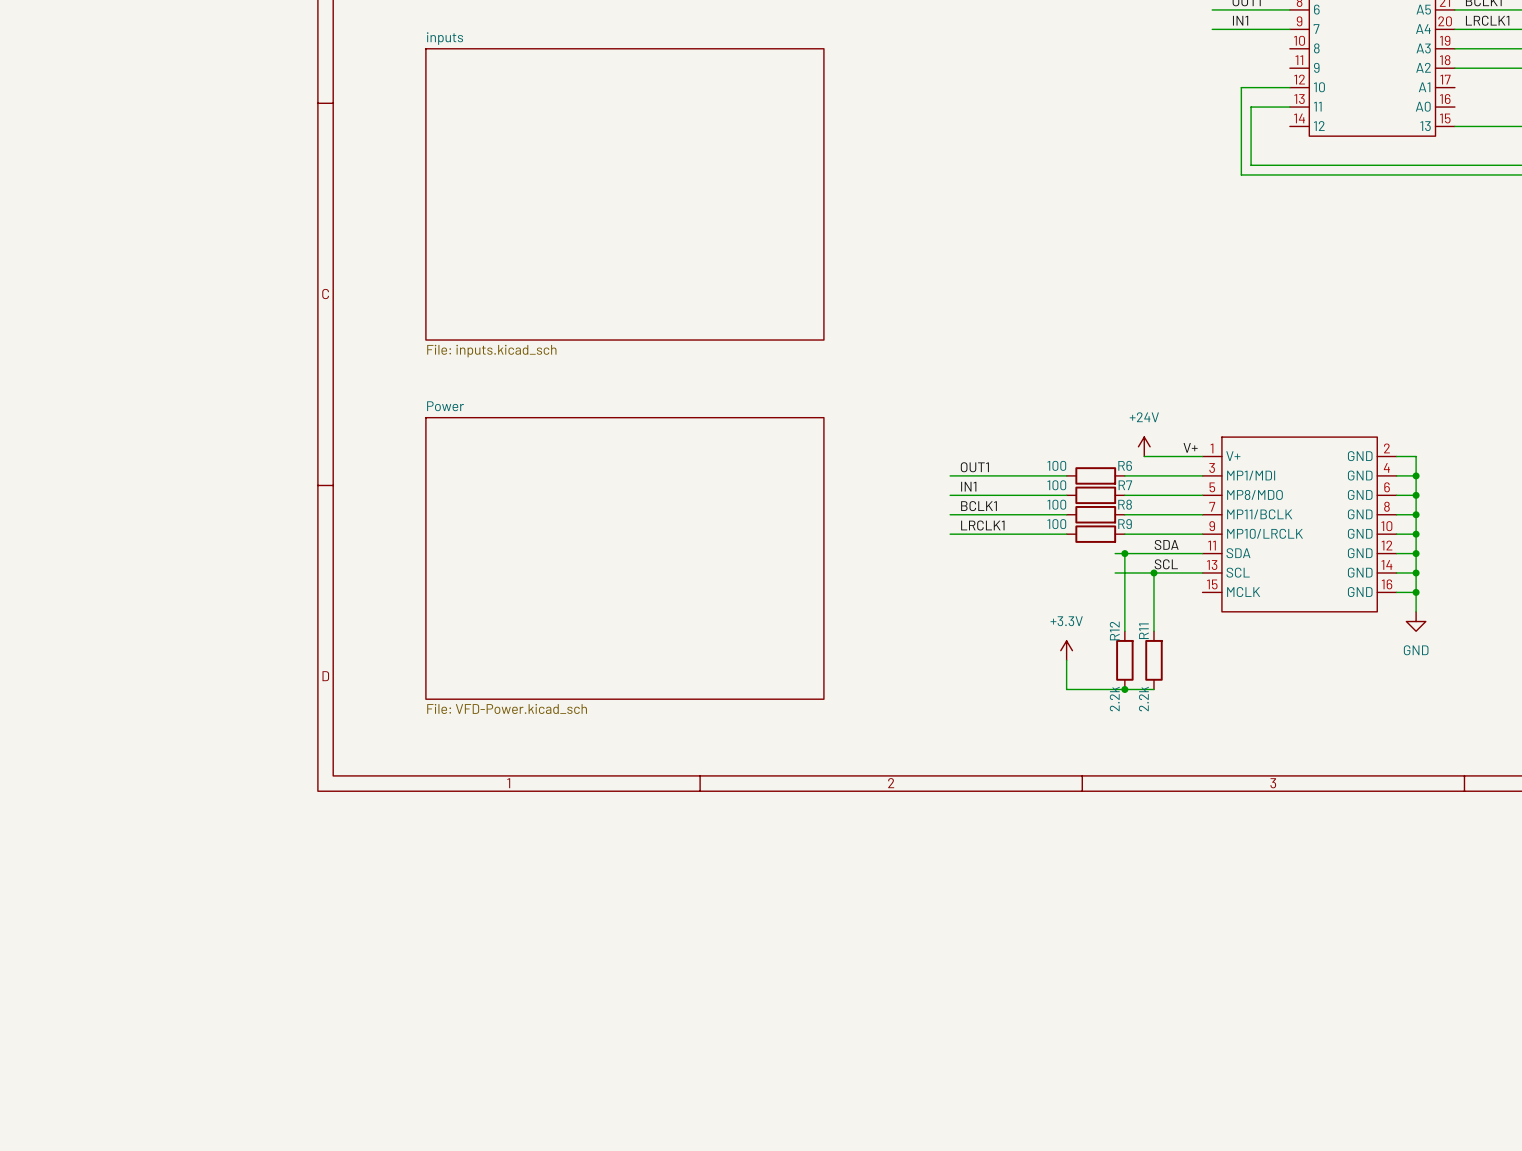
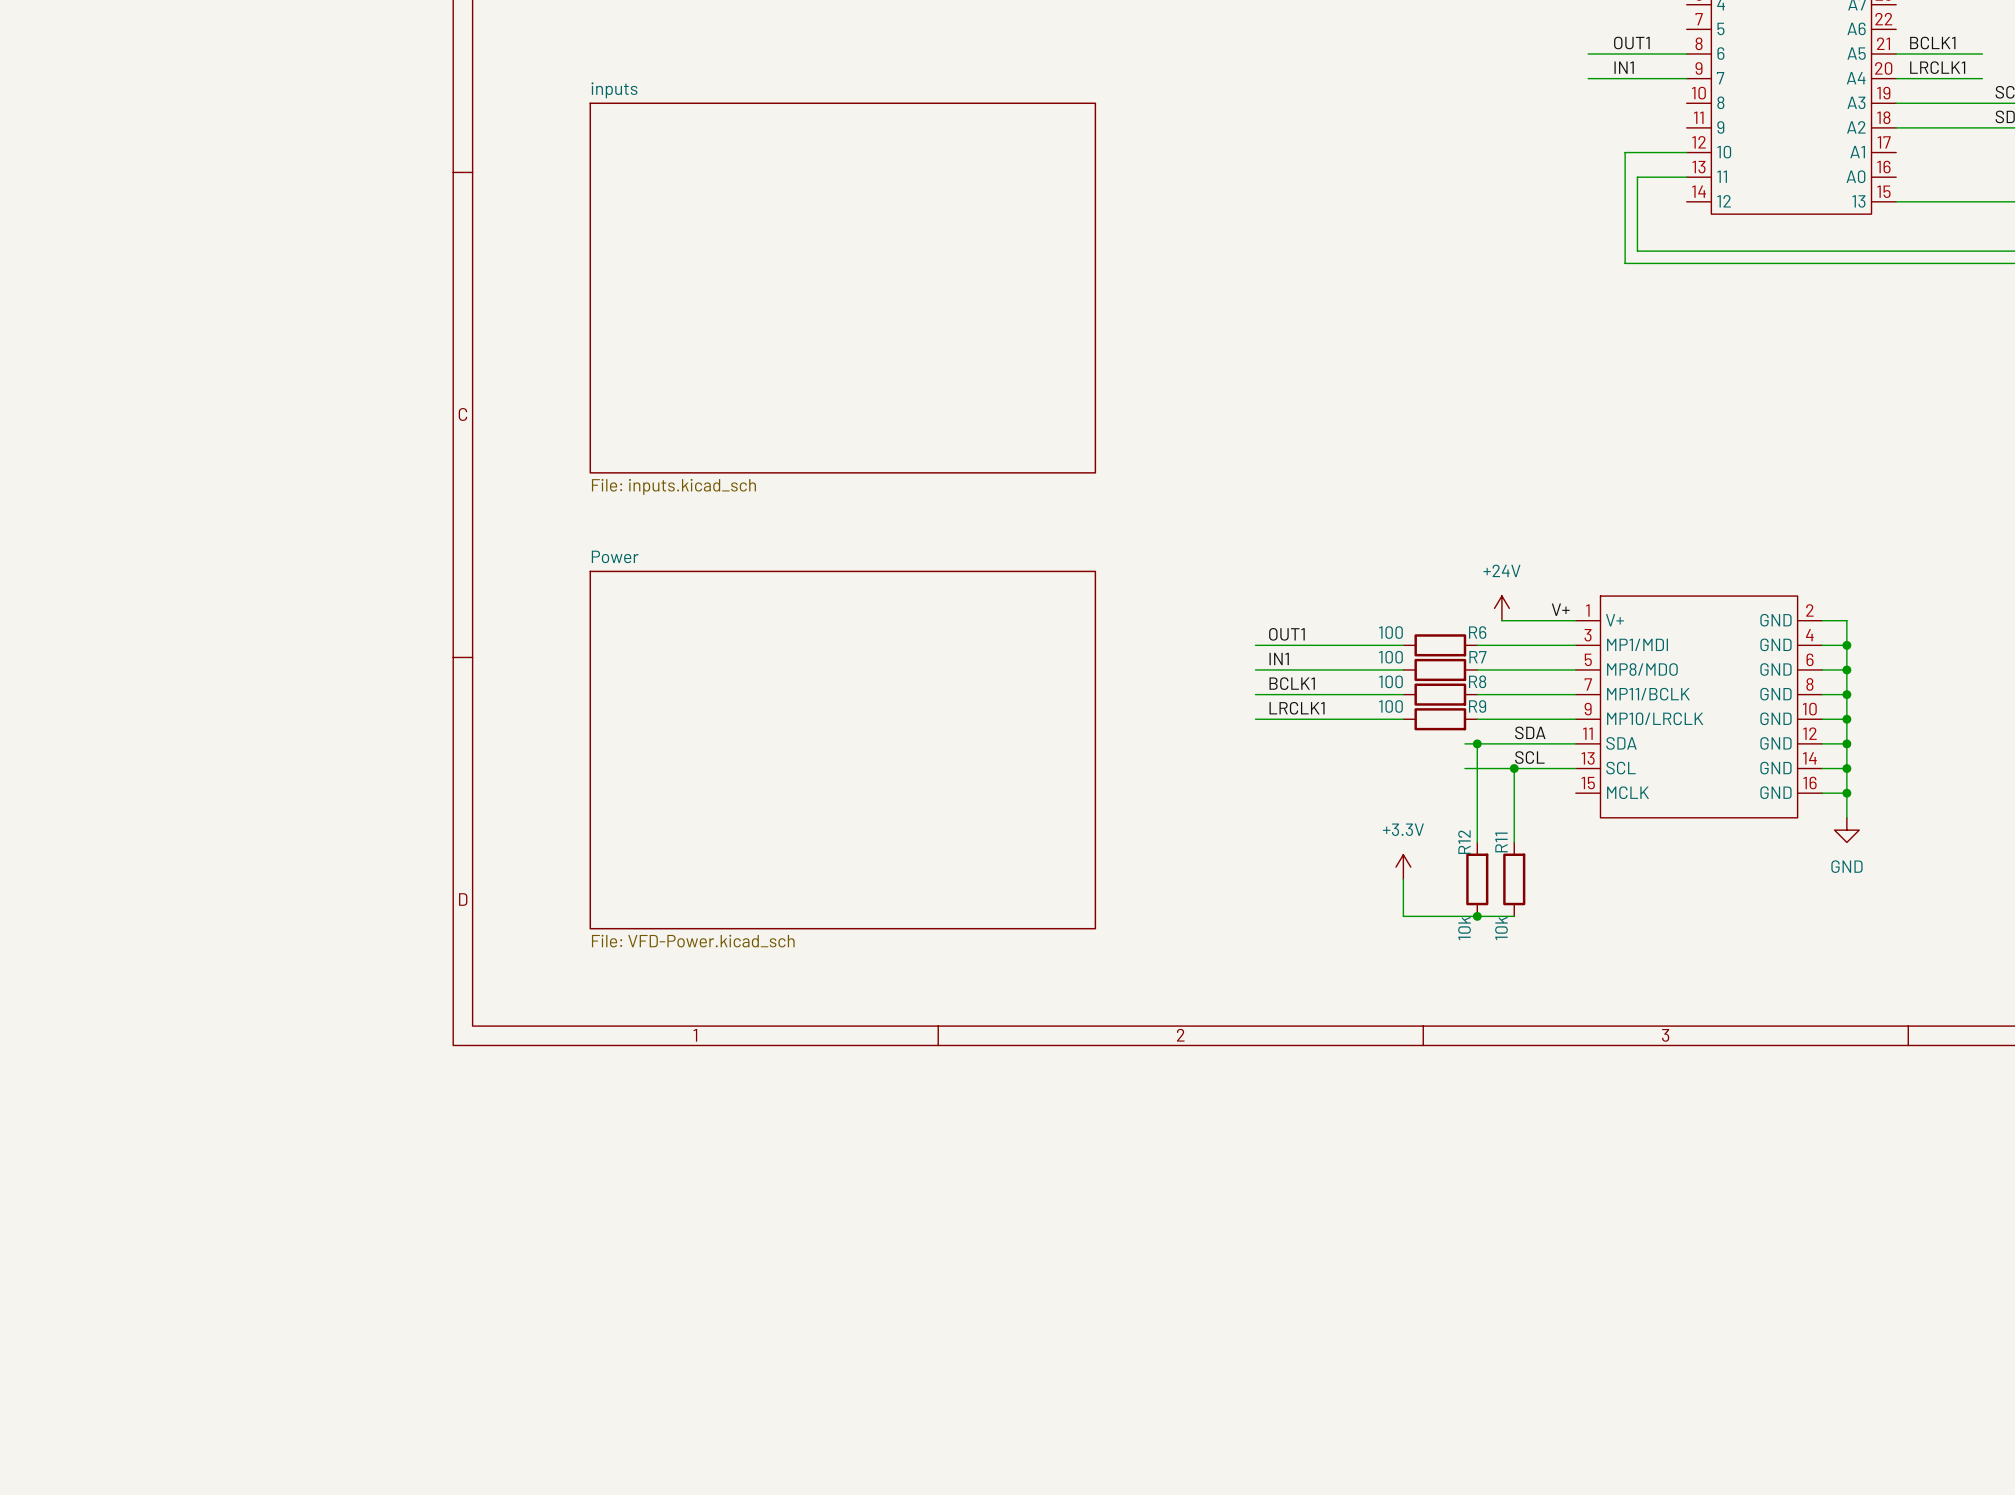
R12 value: 2.2k (1114, 699) -> 10k (1464, 928)
R11 value: 2.2k (1143, 699) -> 10k (1501, 928)

